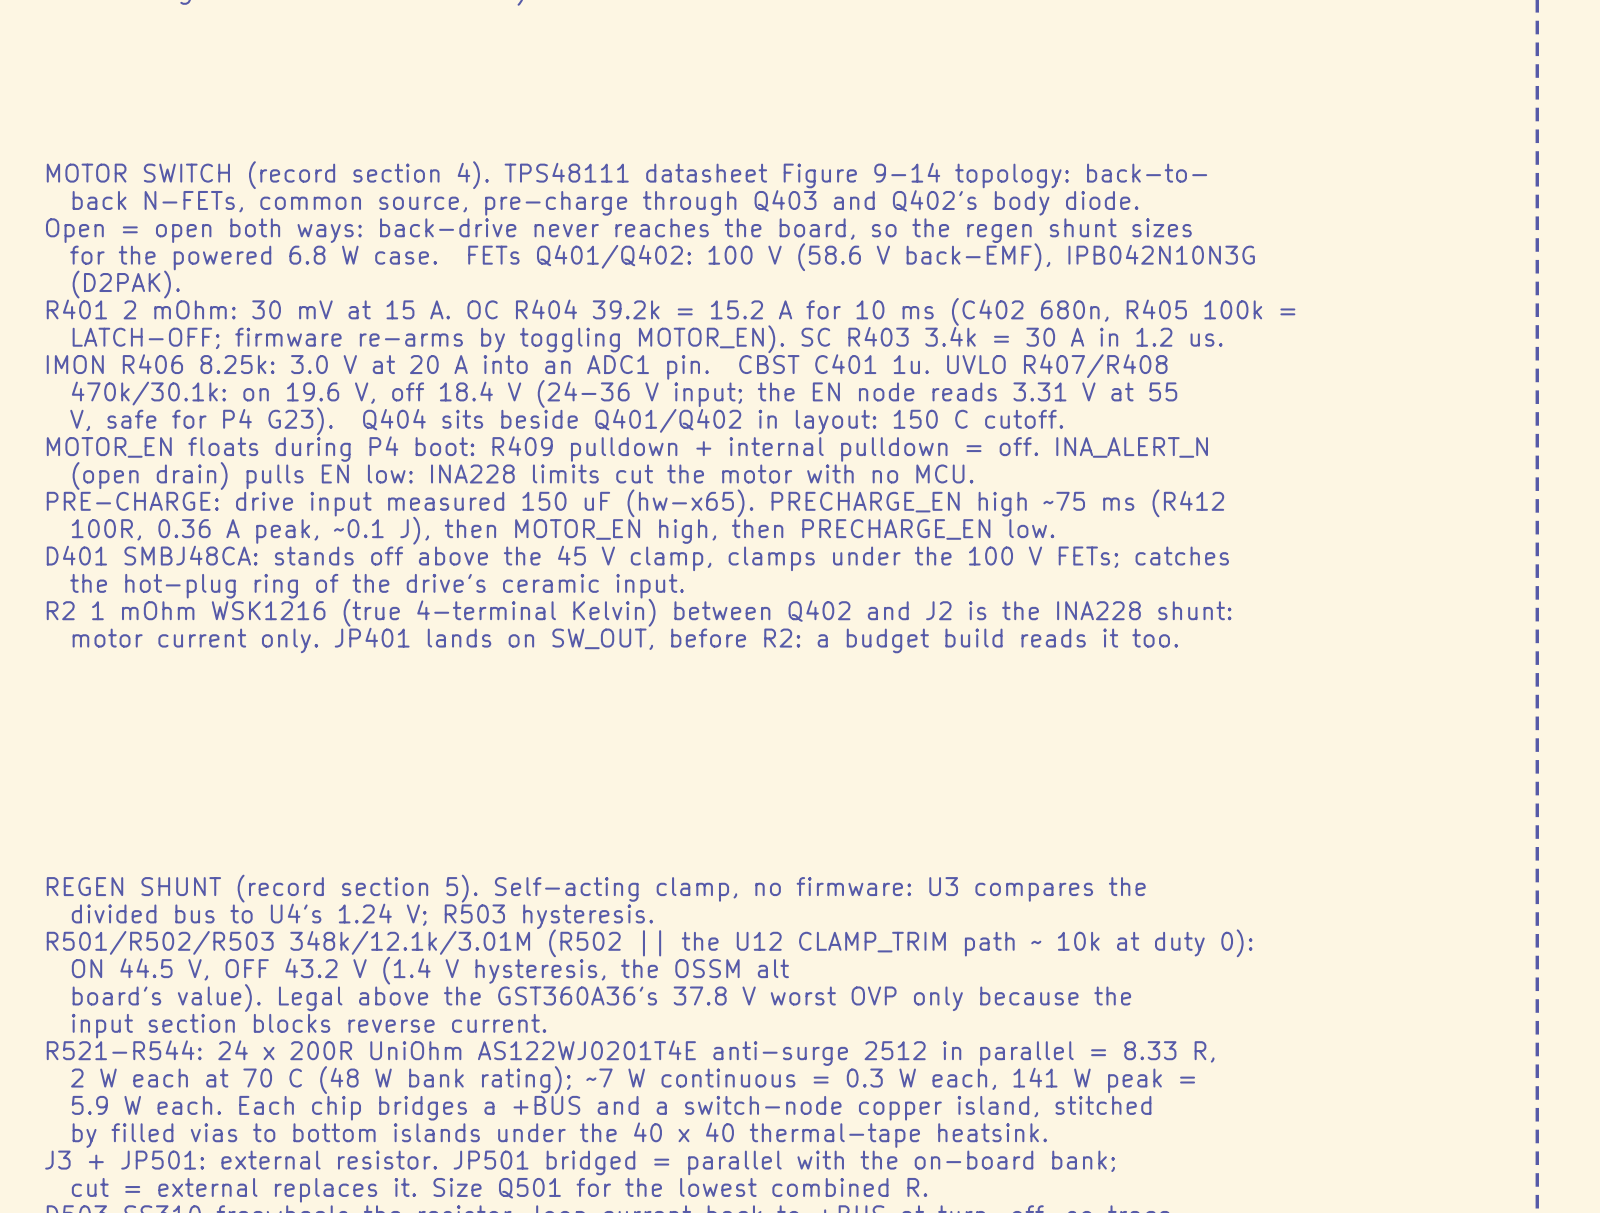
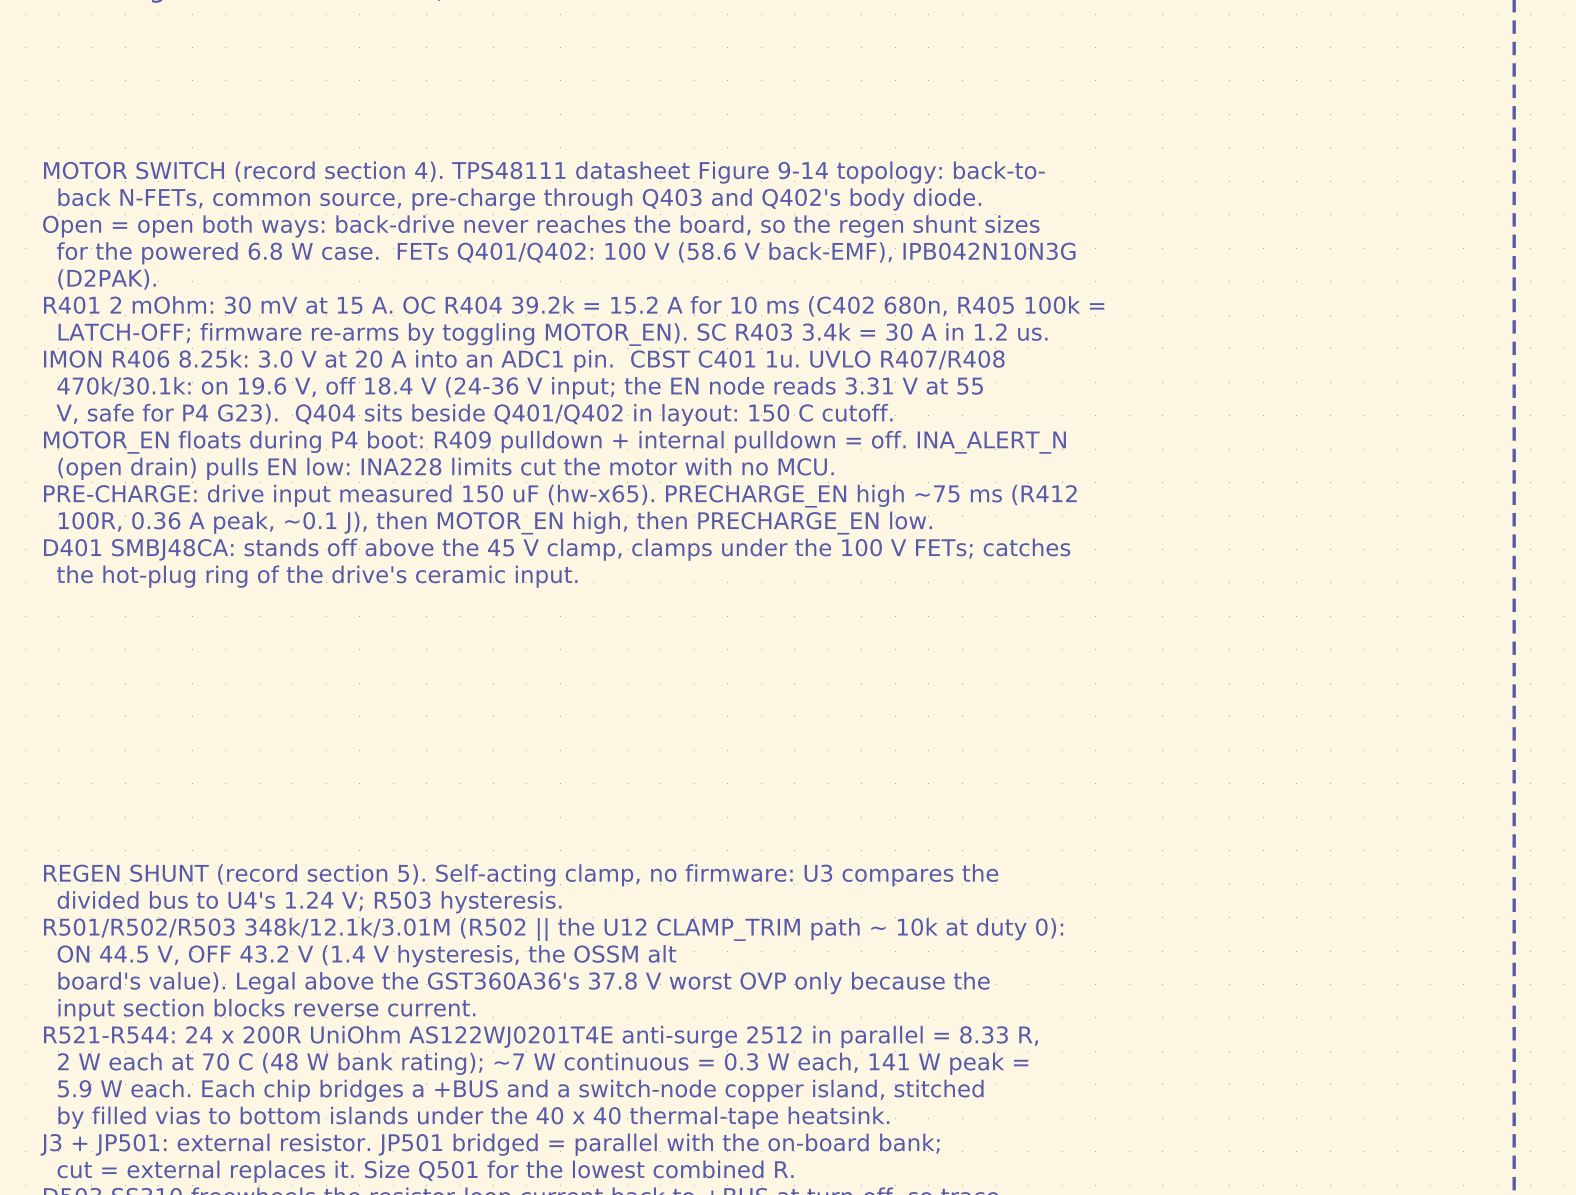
text: R2 1 mOhm WSK1216 (true 4-terminal Kelvin) between Q402 and J2 is the INA228 shunt: (639, 612) -> none
text: motor current only. JP401 lands on SW_OUT, before R2: a budget build reads it too. (625, 640) -> none

